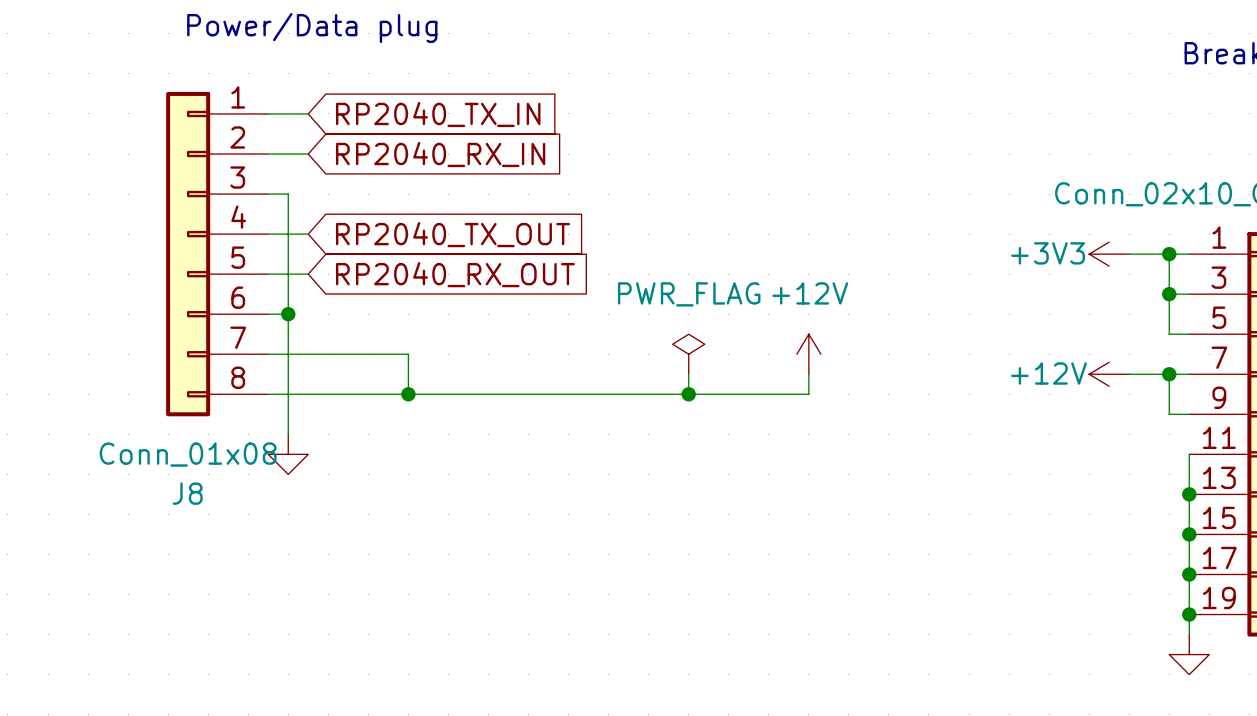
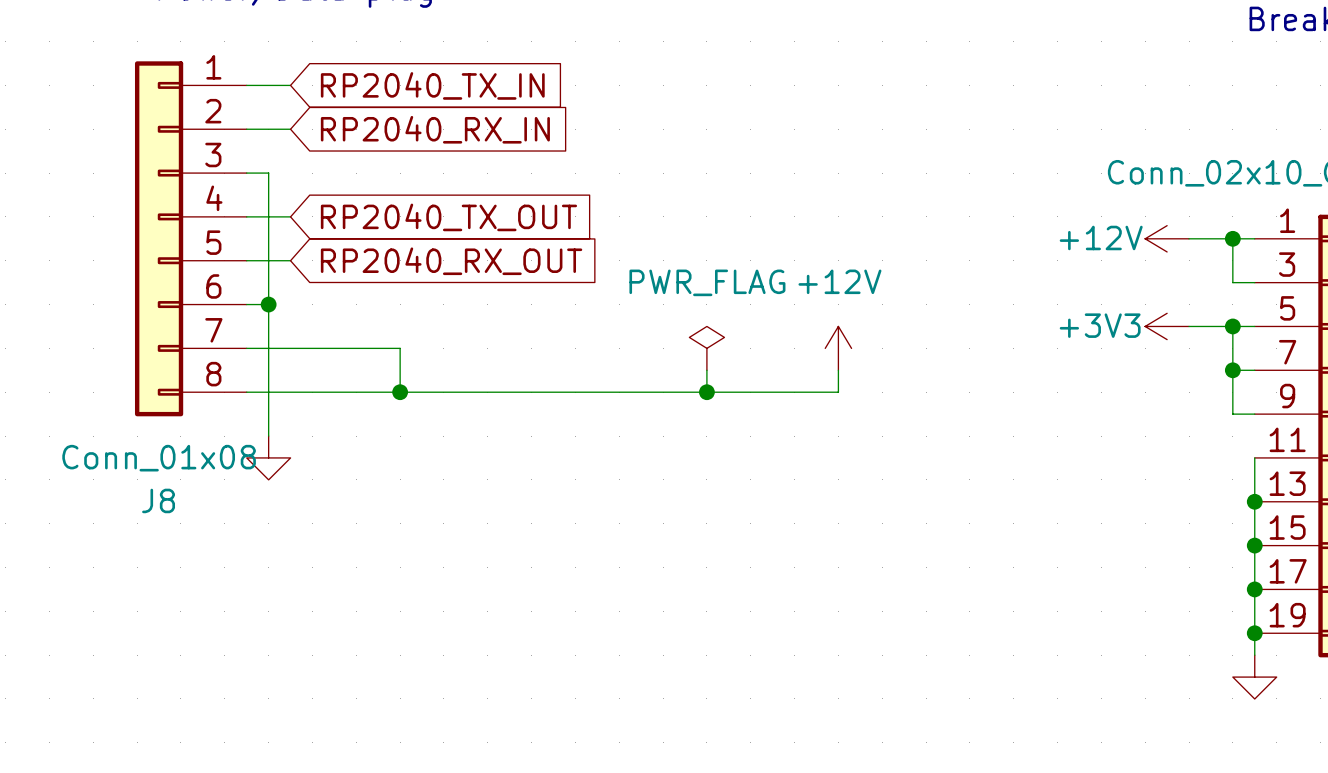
power symbol: +3V3 (1109, 254) -> +12V (1167, 238)
wire: (1169, 294) (1169, 334) -> none
junction position: (1169, 294) -> (1232, 326)
power symbol: none -> +3V3 (1167, 326)
power symbol: +12V (1109, 374) -> none
wire: (1129, 374) (1169, 374) -> (1189, 326) (1232, 326) (1232, 370)

